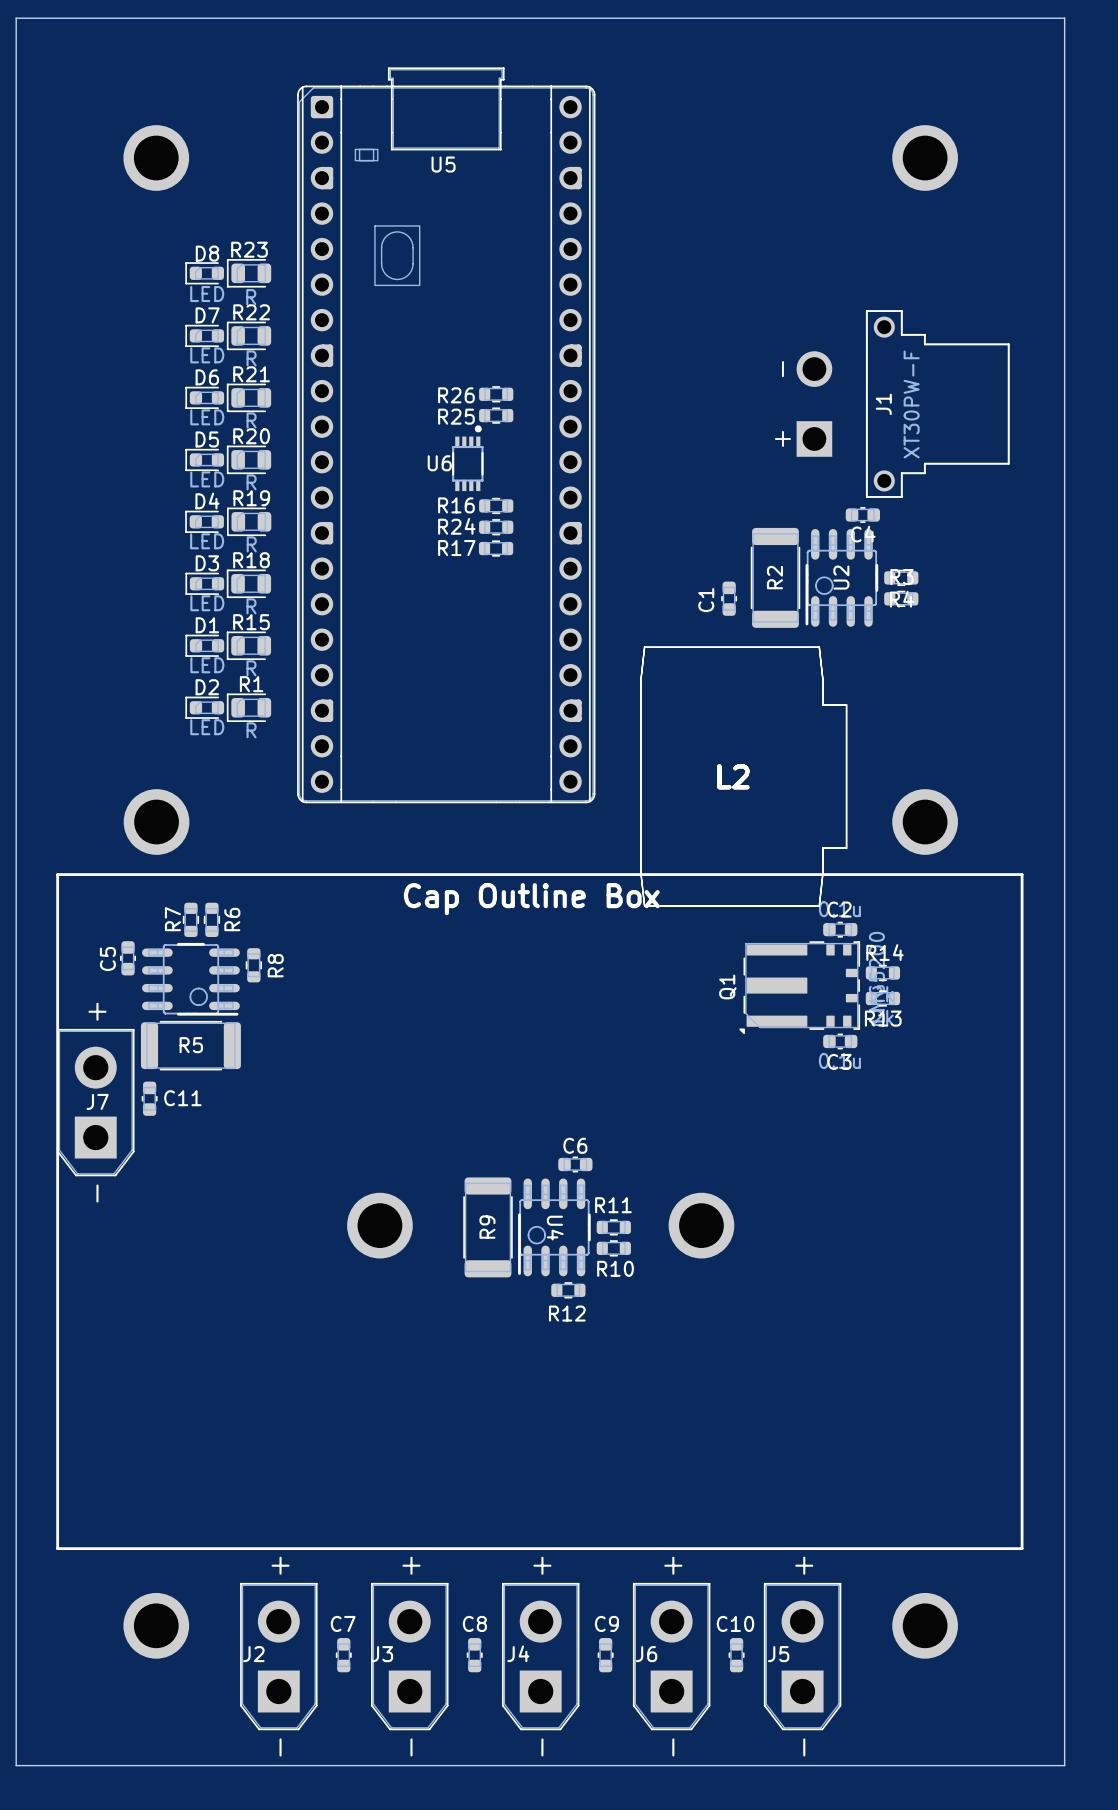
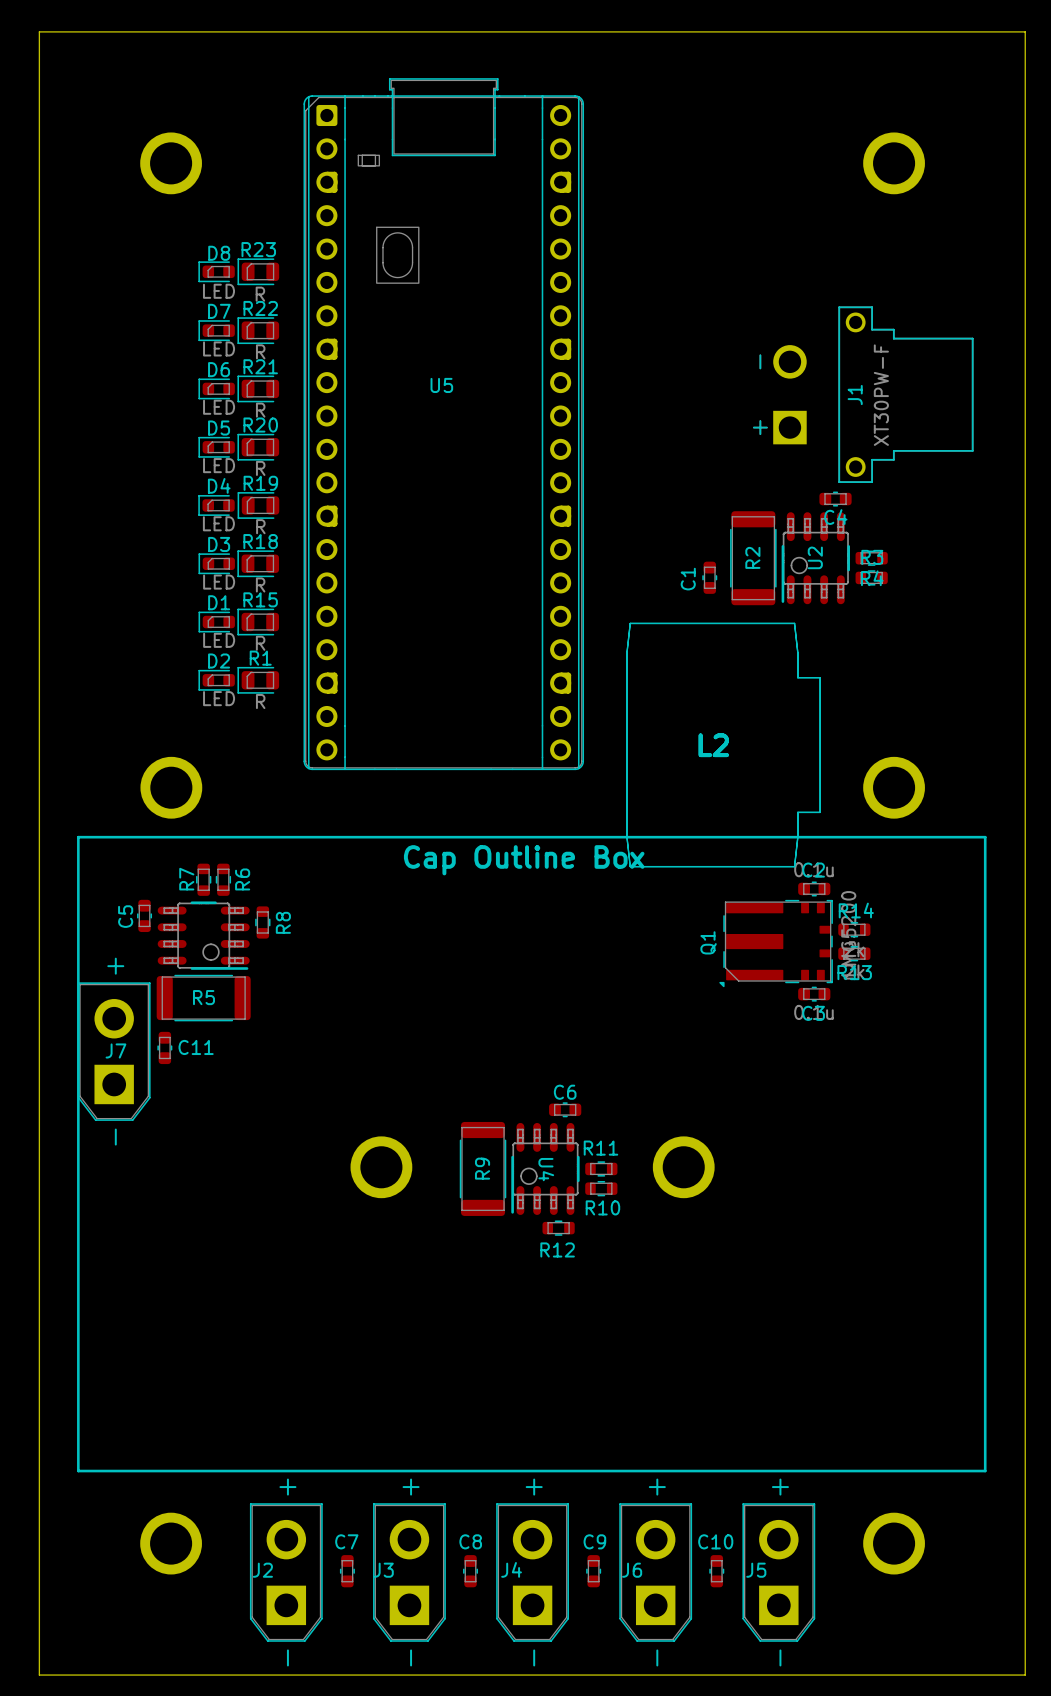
U5 name position: U5 (443, 164) -> U5 (441, 385)
R26: (496, 394) -> none
R25: (496, 415) -> none
U6: (467, 458) -> none
R16: (496, 505) -> none
R24: (496, 527) -> none
R17: (496, 548) -> none

